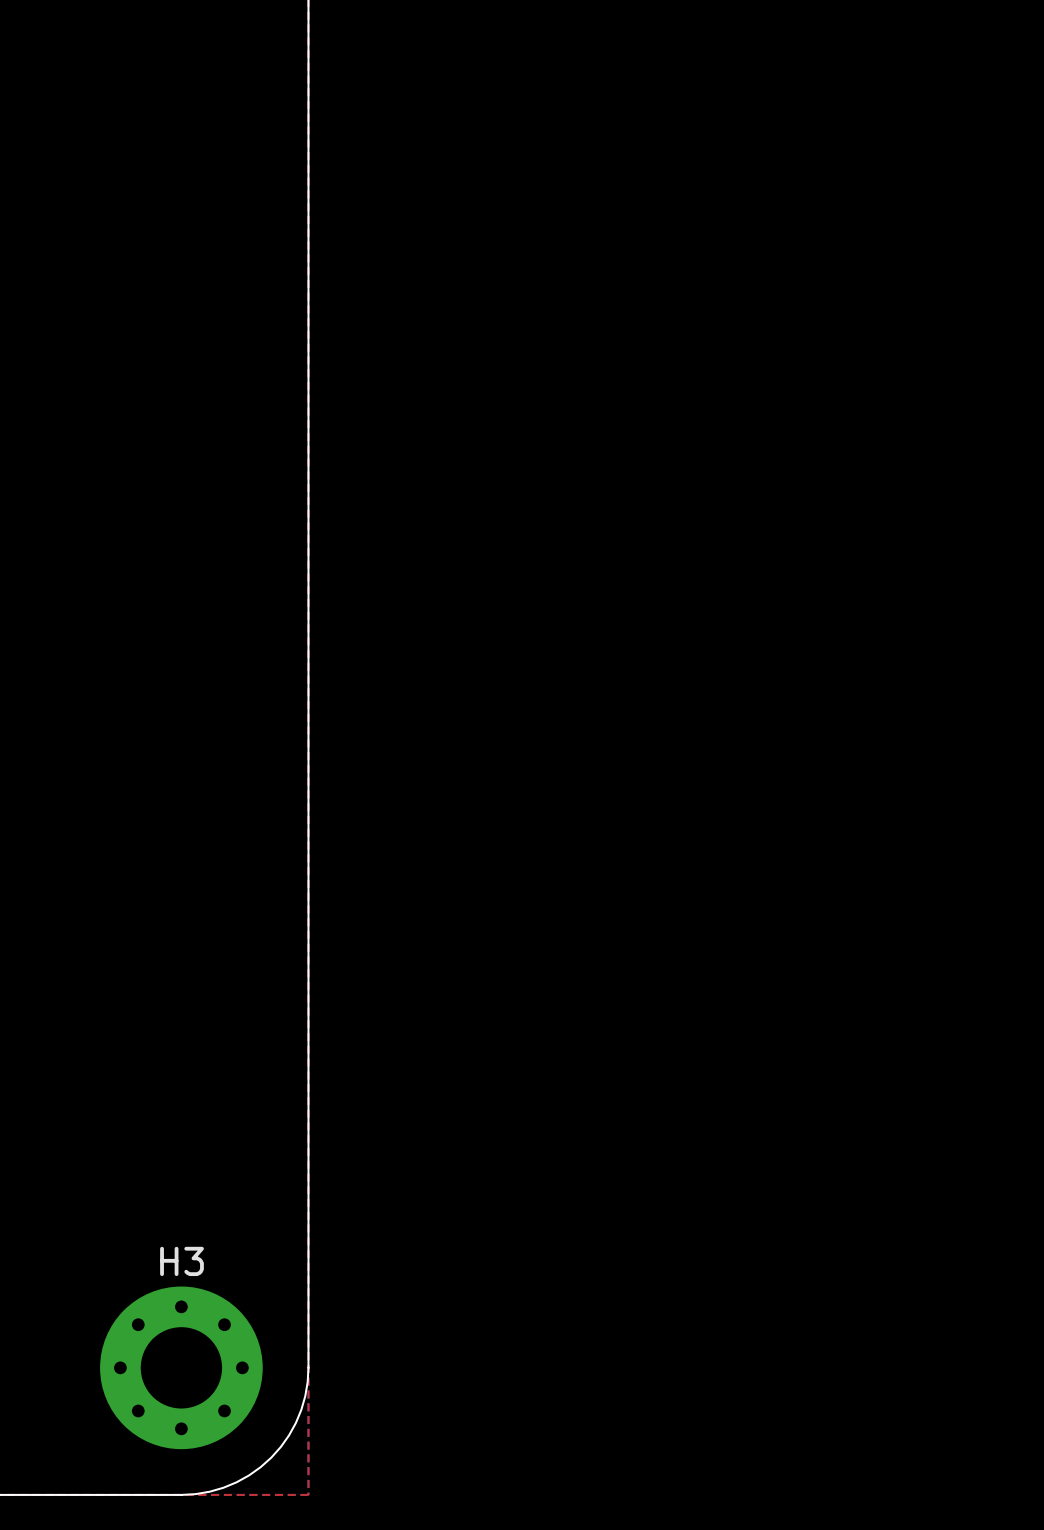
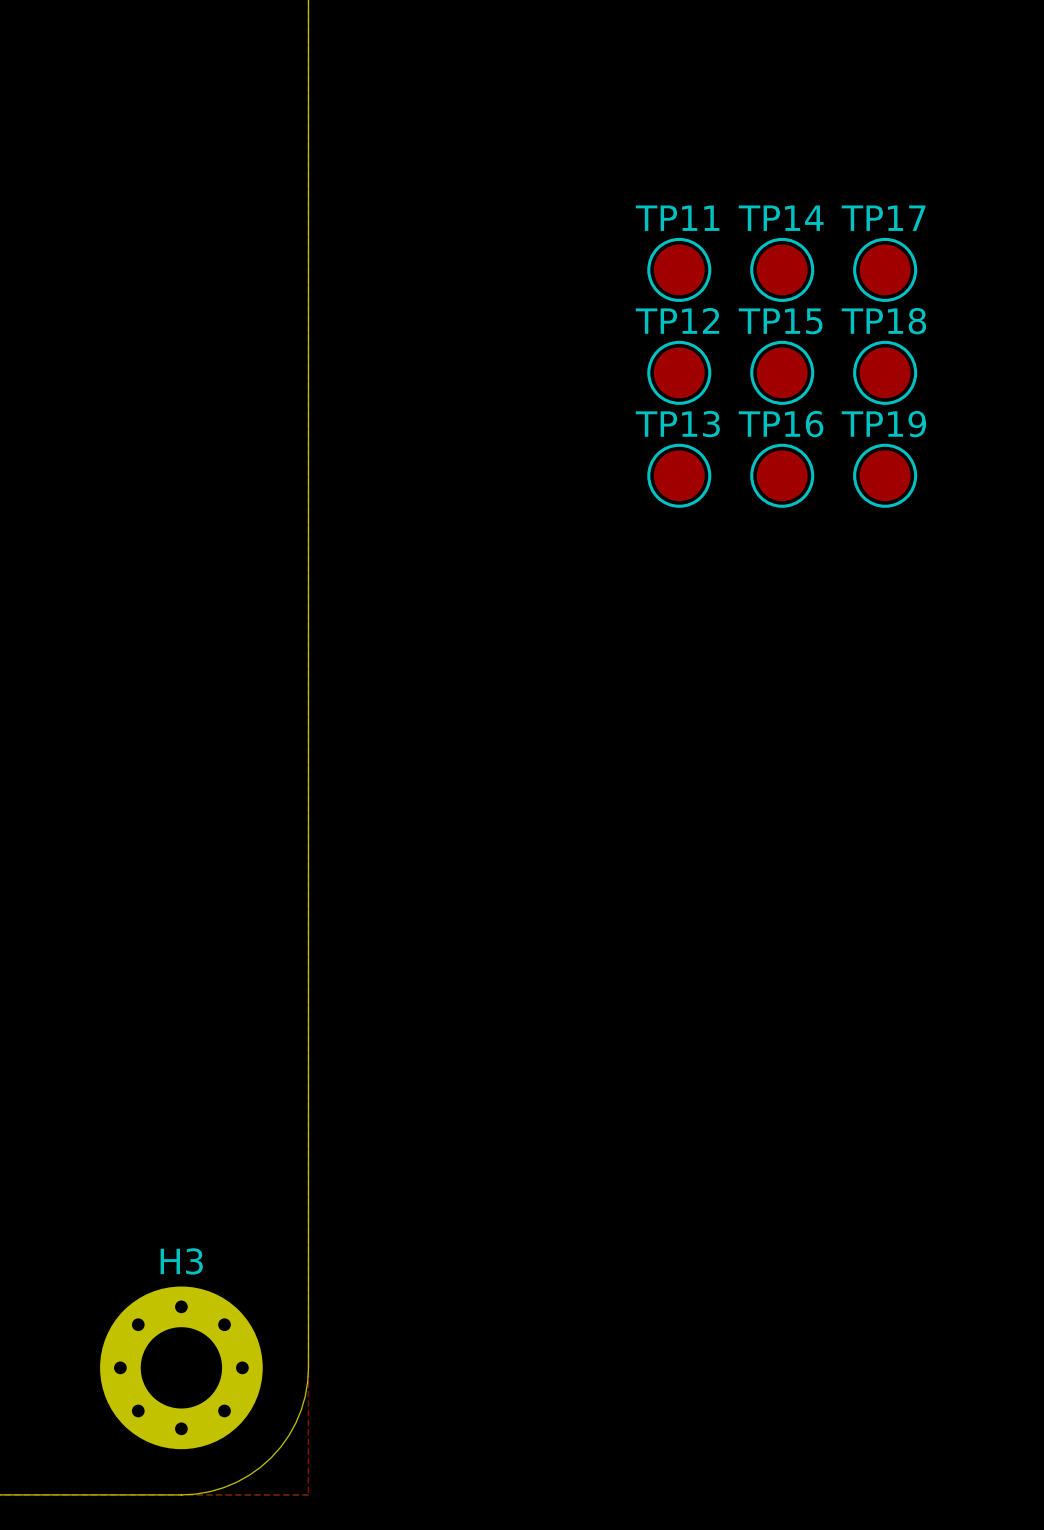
TP11: none -> (679, 269)
TP14: none -> (782, 269)
TP17: none -> (885, 269)
TP12: none -> (679, 372)
TP15: none -> (782, 372)
TP18: none -> (885, 372)
TP13: none -> (679, 475)
TP16: none -> (782, 475)
TP19: none -> (885, 475)

